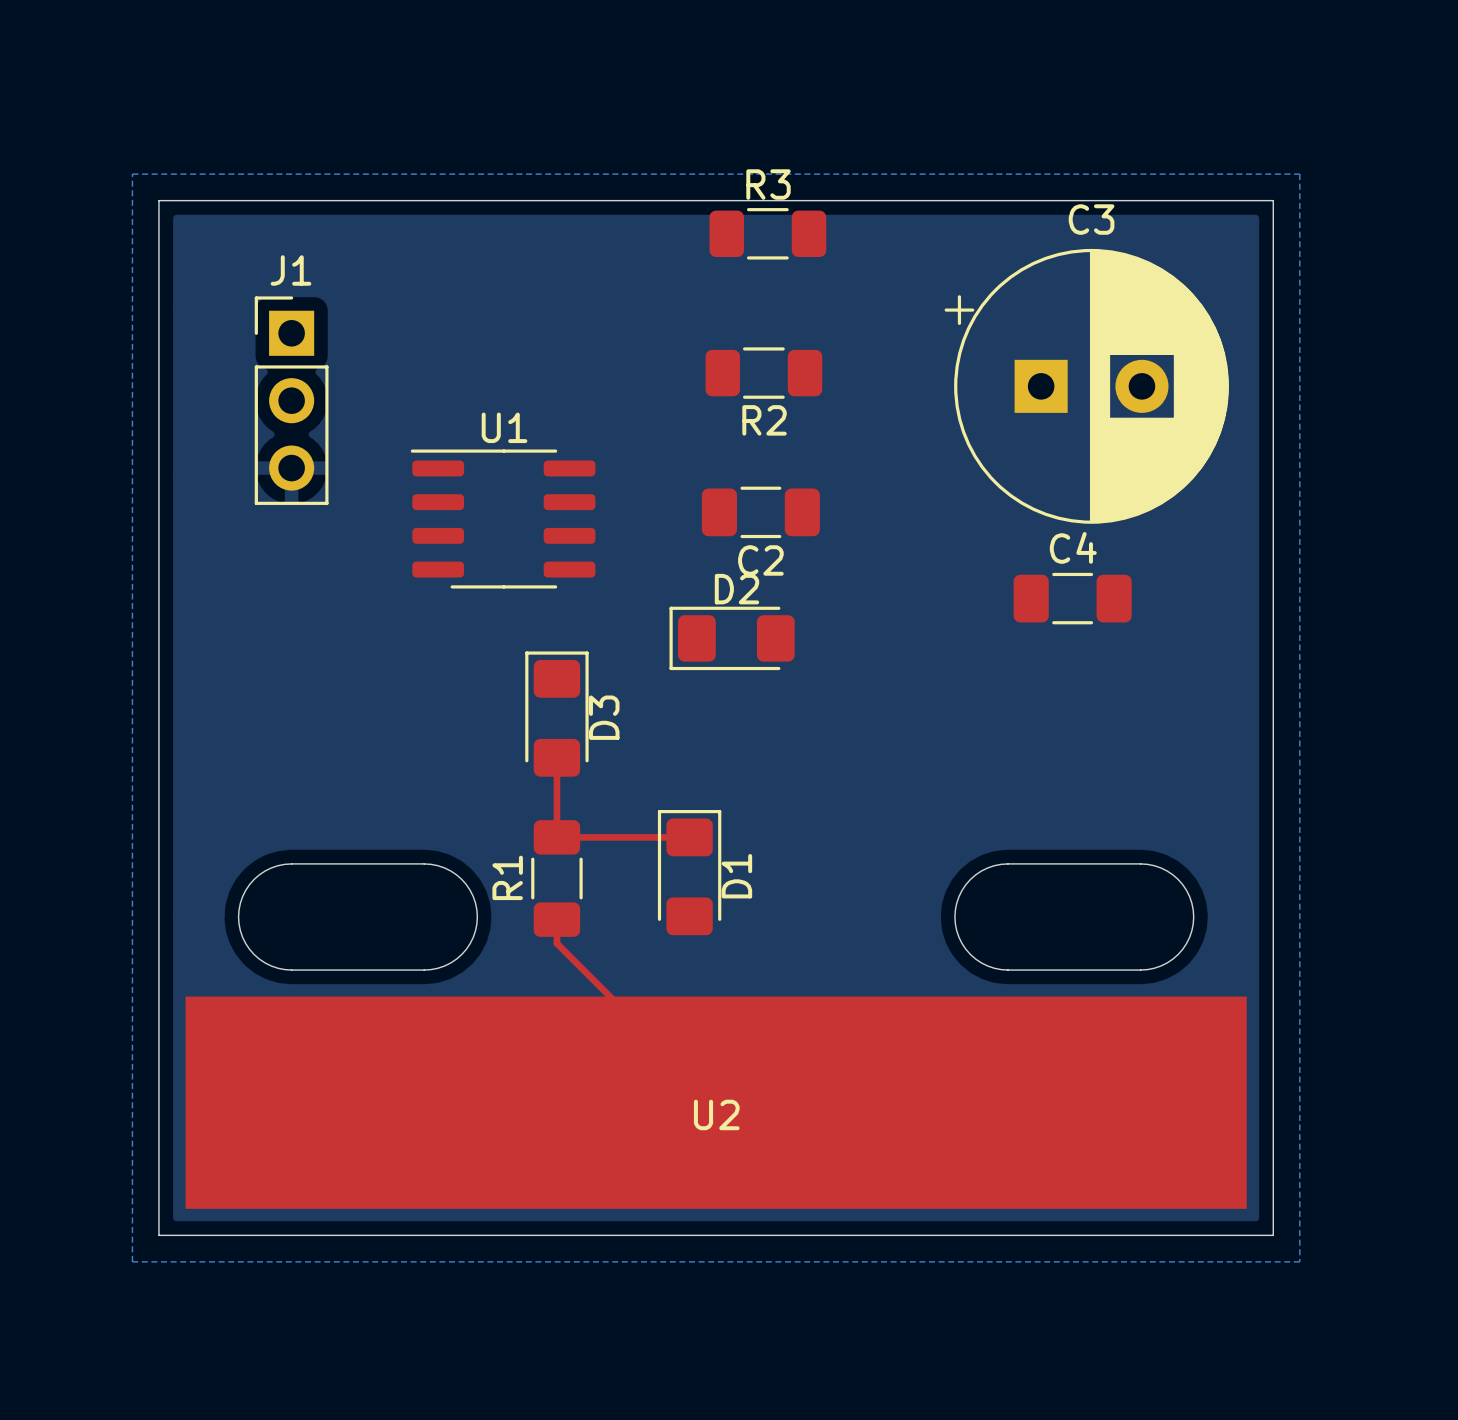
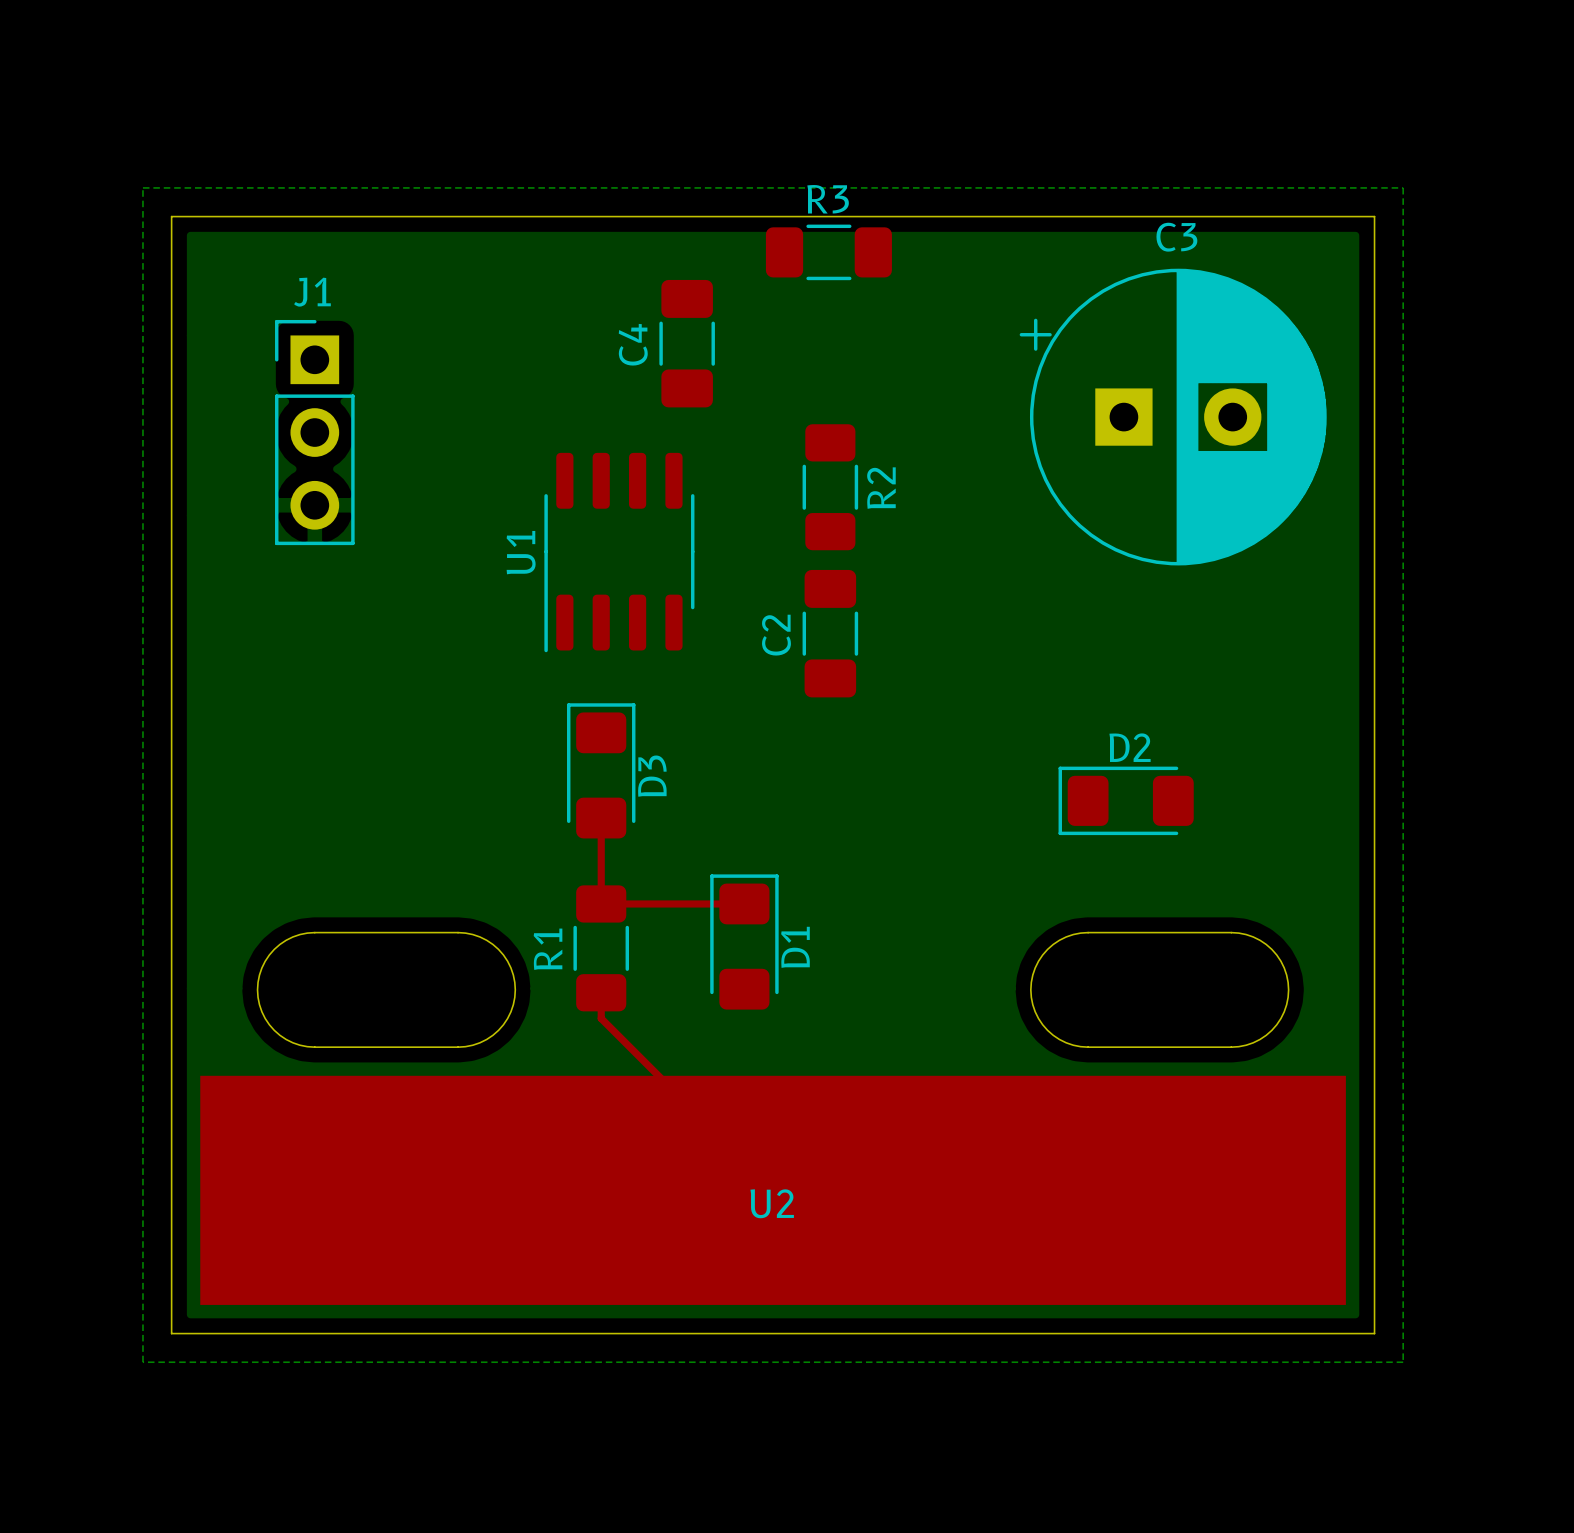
R2 rotation: 0° (763, 373) -> 90° clockwise (830, 487)
R2 position: (763, 373) -> (830, 487)
R2 name position: R2 (764, 420) -> R2 (881, 488)
C2 rotation: 0° (760, 512) -> 90° clockwise (830, 633)
C2 position: (760, 512) -> (830, 633)
U1 rotation: 0° (503, 519) -> 90° counterclockwise (619, 552)
C4 name position: C4 (1073, 547) -> C4 (633, 344)
C4 rotation: 0° (1072, 598) -> 90° clockwise (687, 343)
C4 position: (1072, 598) -> (687, 343)
D2 position: (732, 638) -> (1126, 800)

